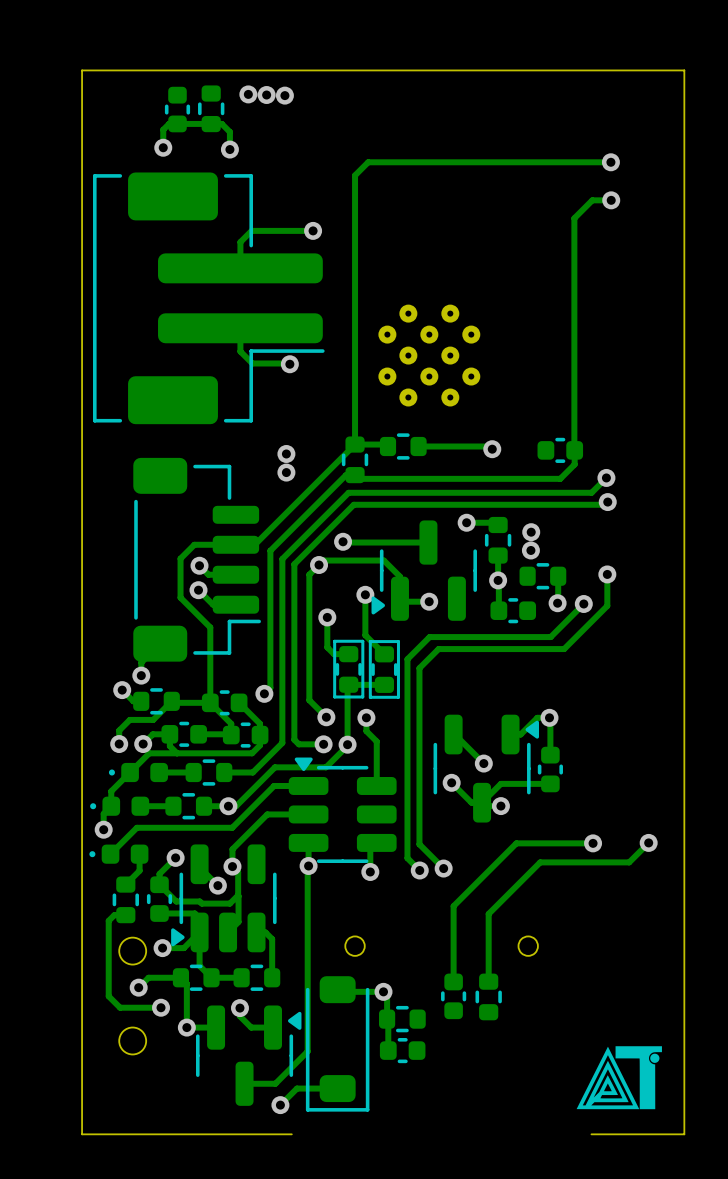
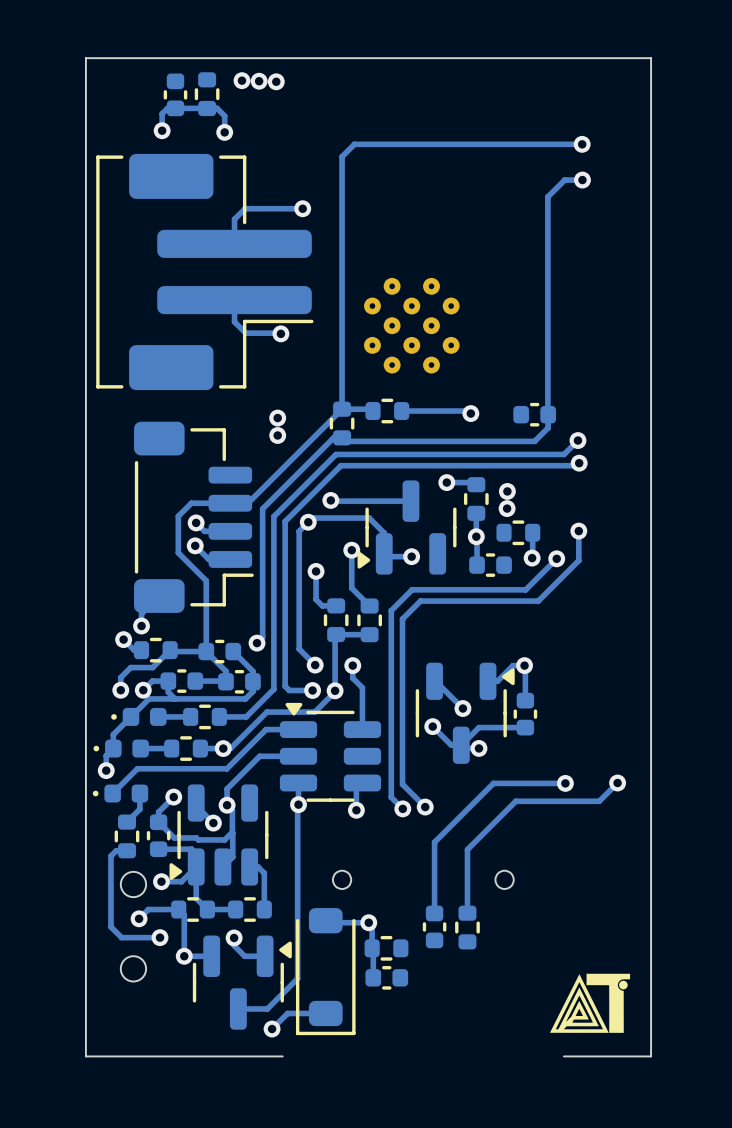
line: (362, 641) (334, 641) (334, 697) (362, 697) (362, 641) -> none
line: (398, 641) (370, 641) (370, 697) (398, 697) (398, 641) -> none

